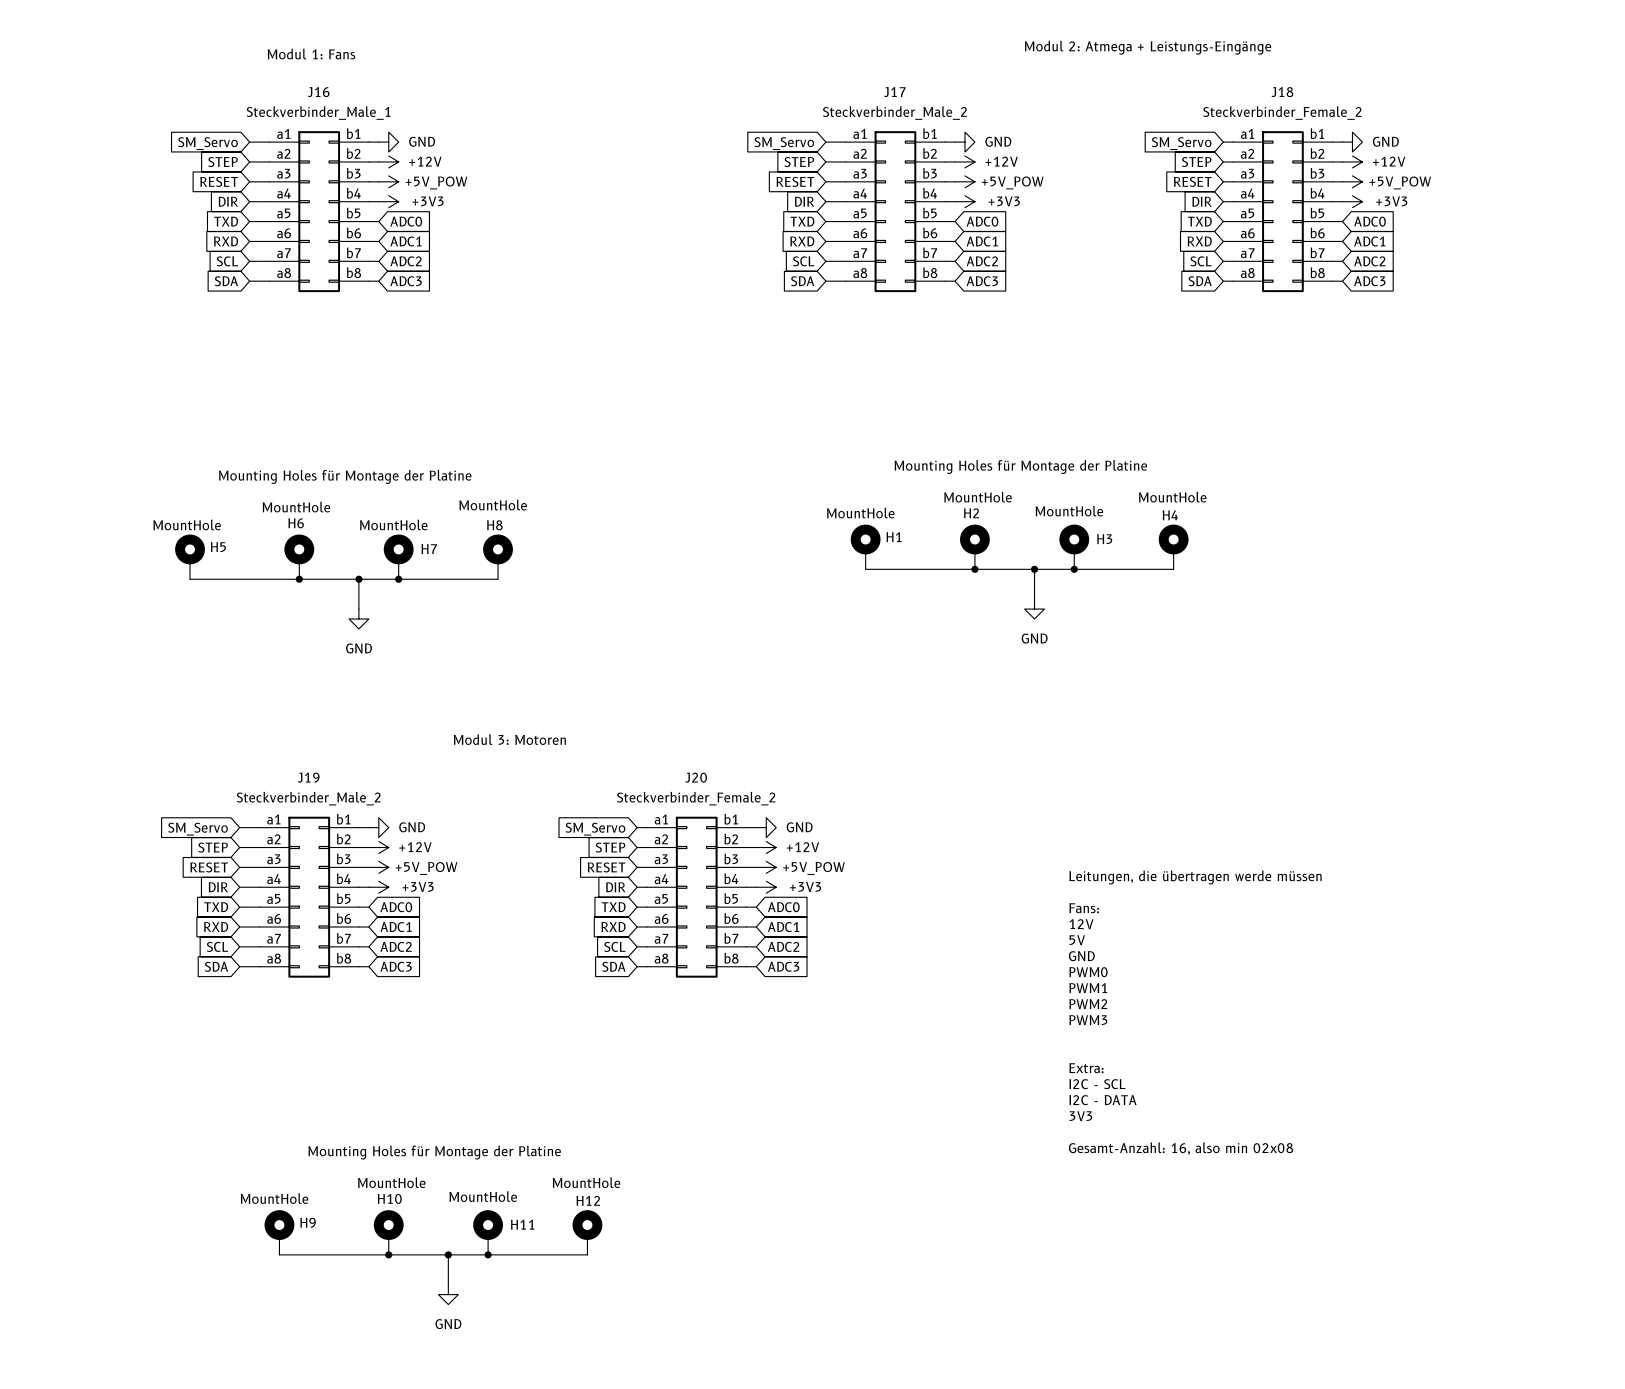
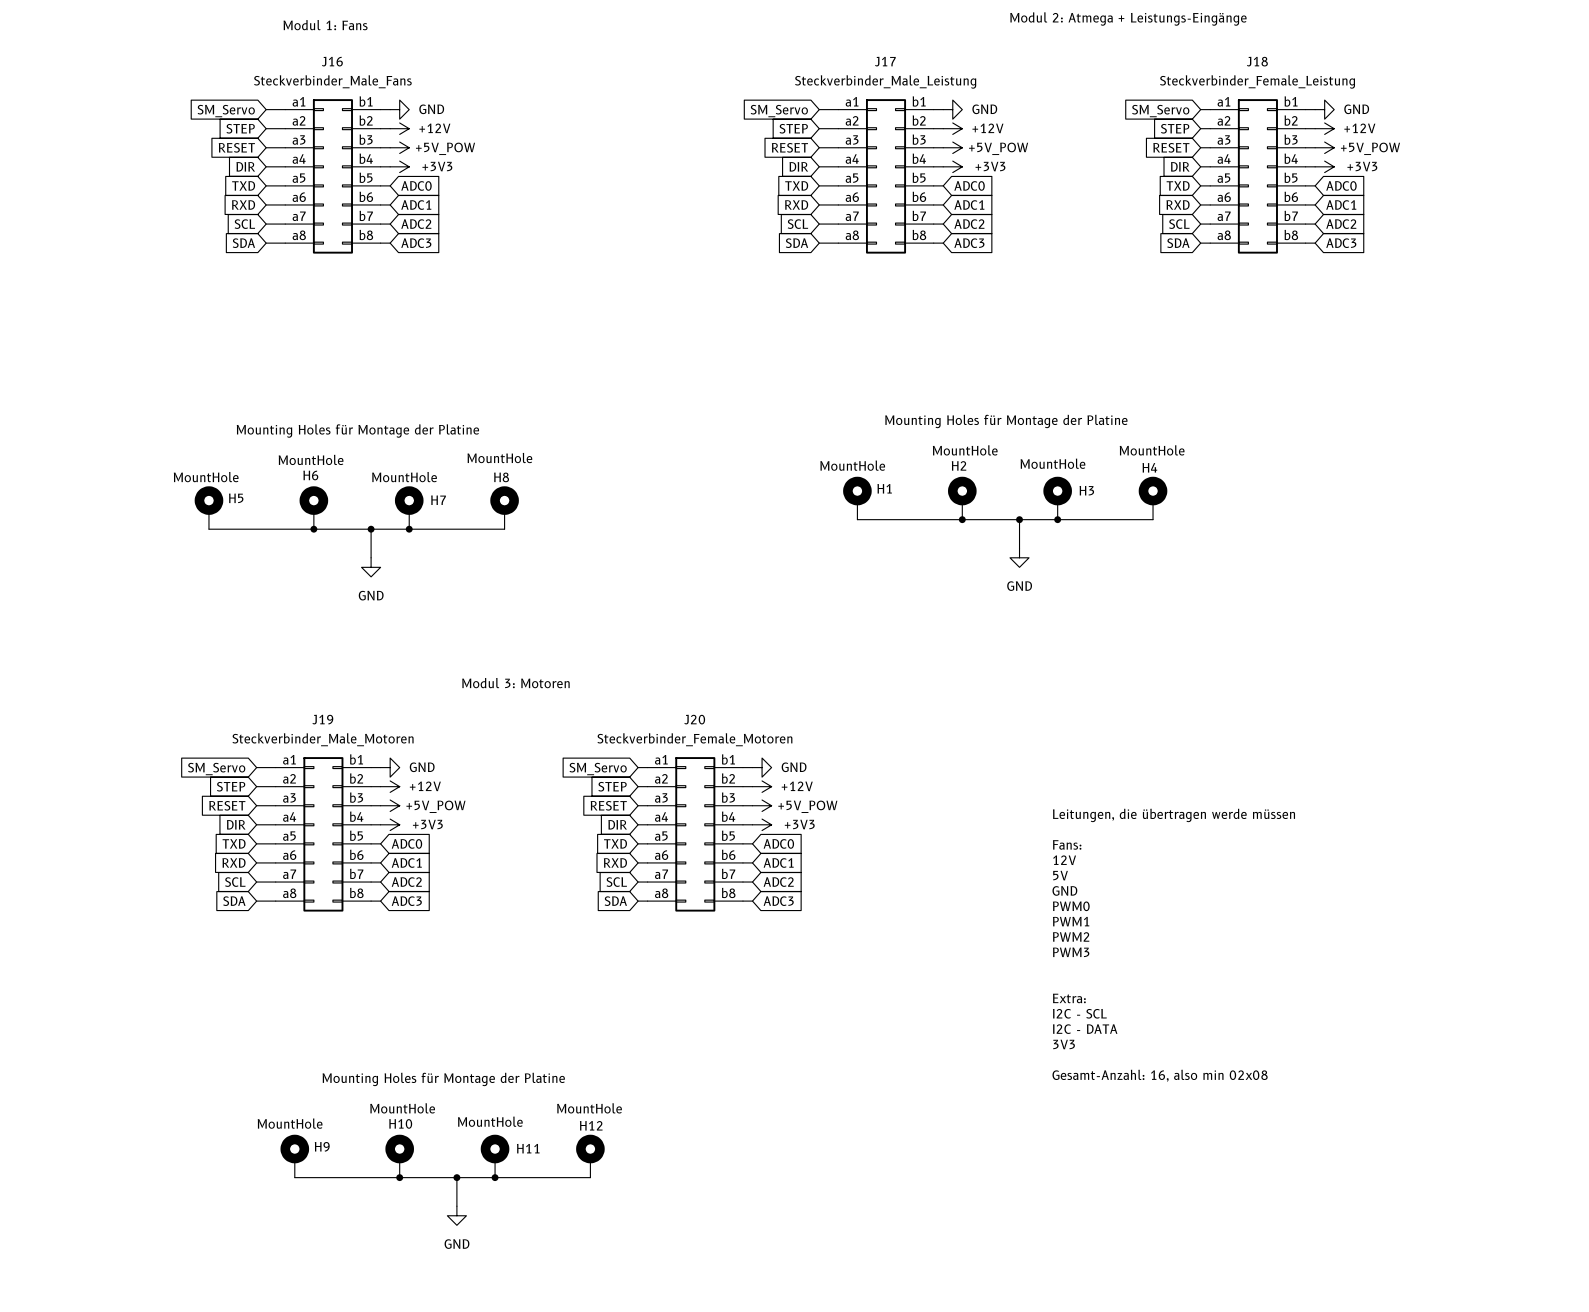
J16 value: Steckverbinder_Male_1 (318, 113) -> Steckverbinder_Male_Fans (332, 81)
J17 value: Steckverbinder_Male_2 (894, 113) -> Steckverbinder_Male_Leistung (885, 81)
J18 value: Steckverbinder_Female_2 (1282, 113) -> Steckverbinder_Female_Leistung (1257, 81)
J19 value: Steckverbinder_Male_2 (308, 798) -> Steckverbinder_Male_Motoren (323, 739)
J20 value: Steckverbinder_Female_2 (696, 798) -> Steckverbinder_Female_Motoren (694, 739)

